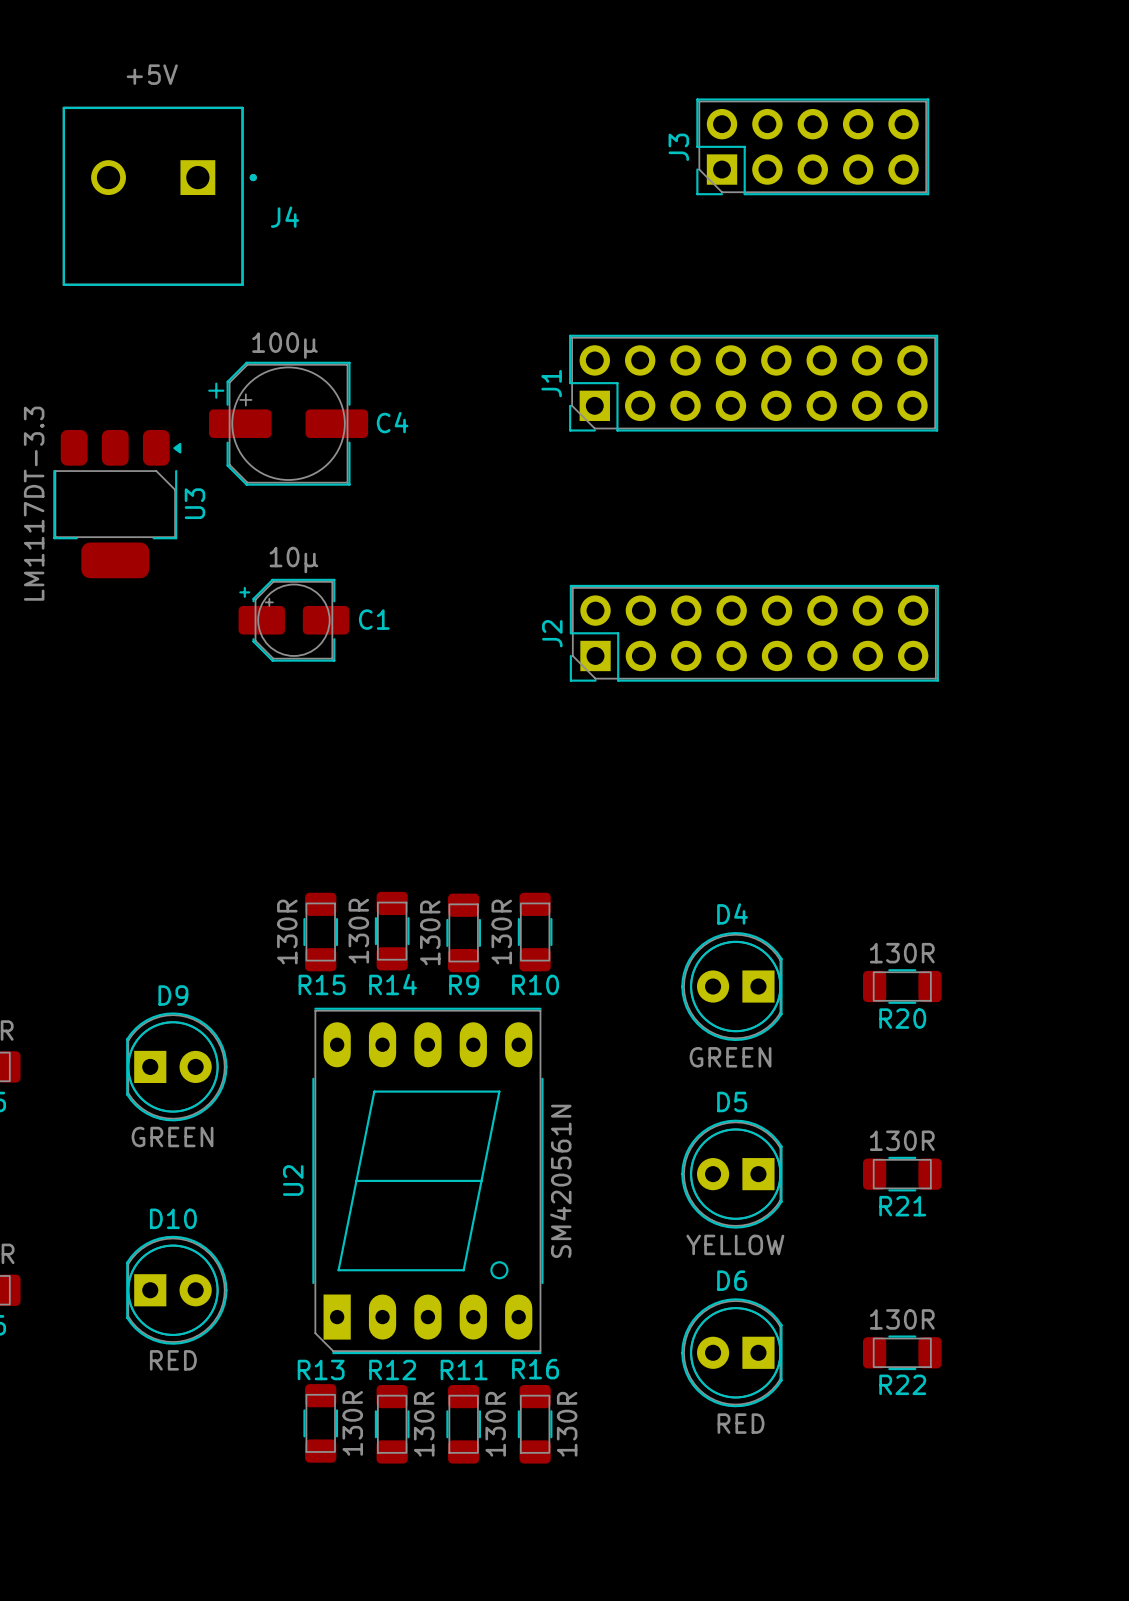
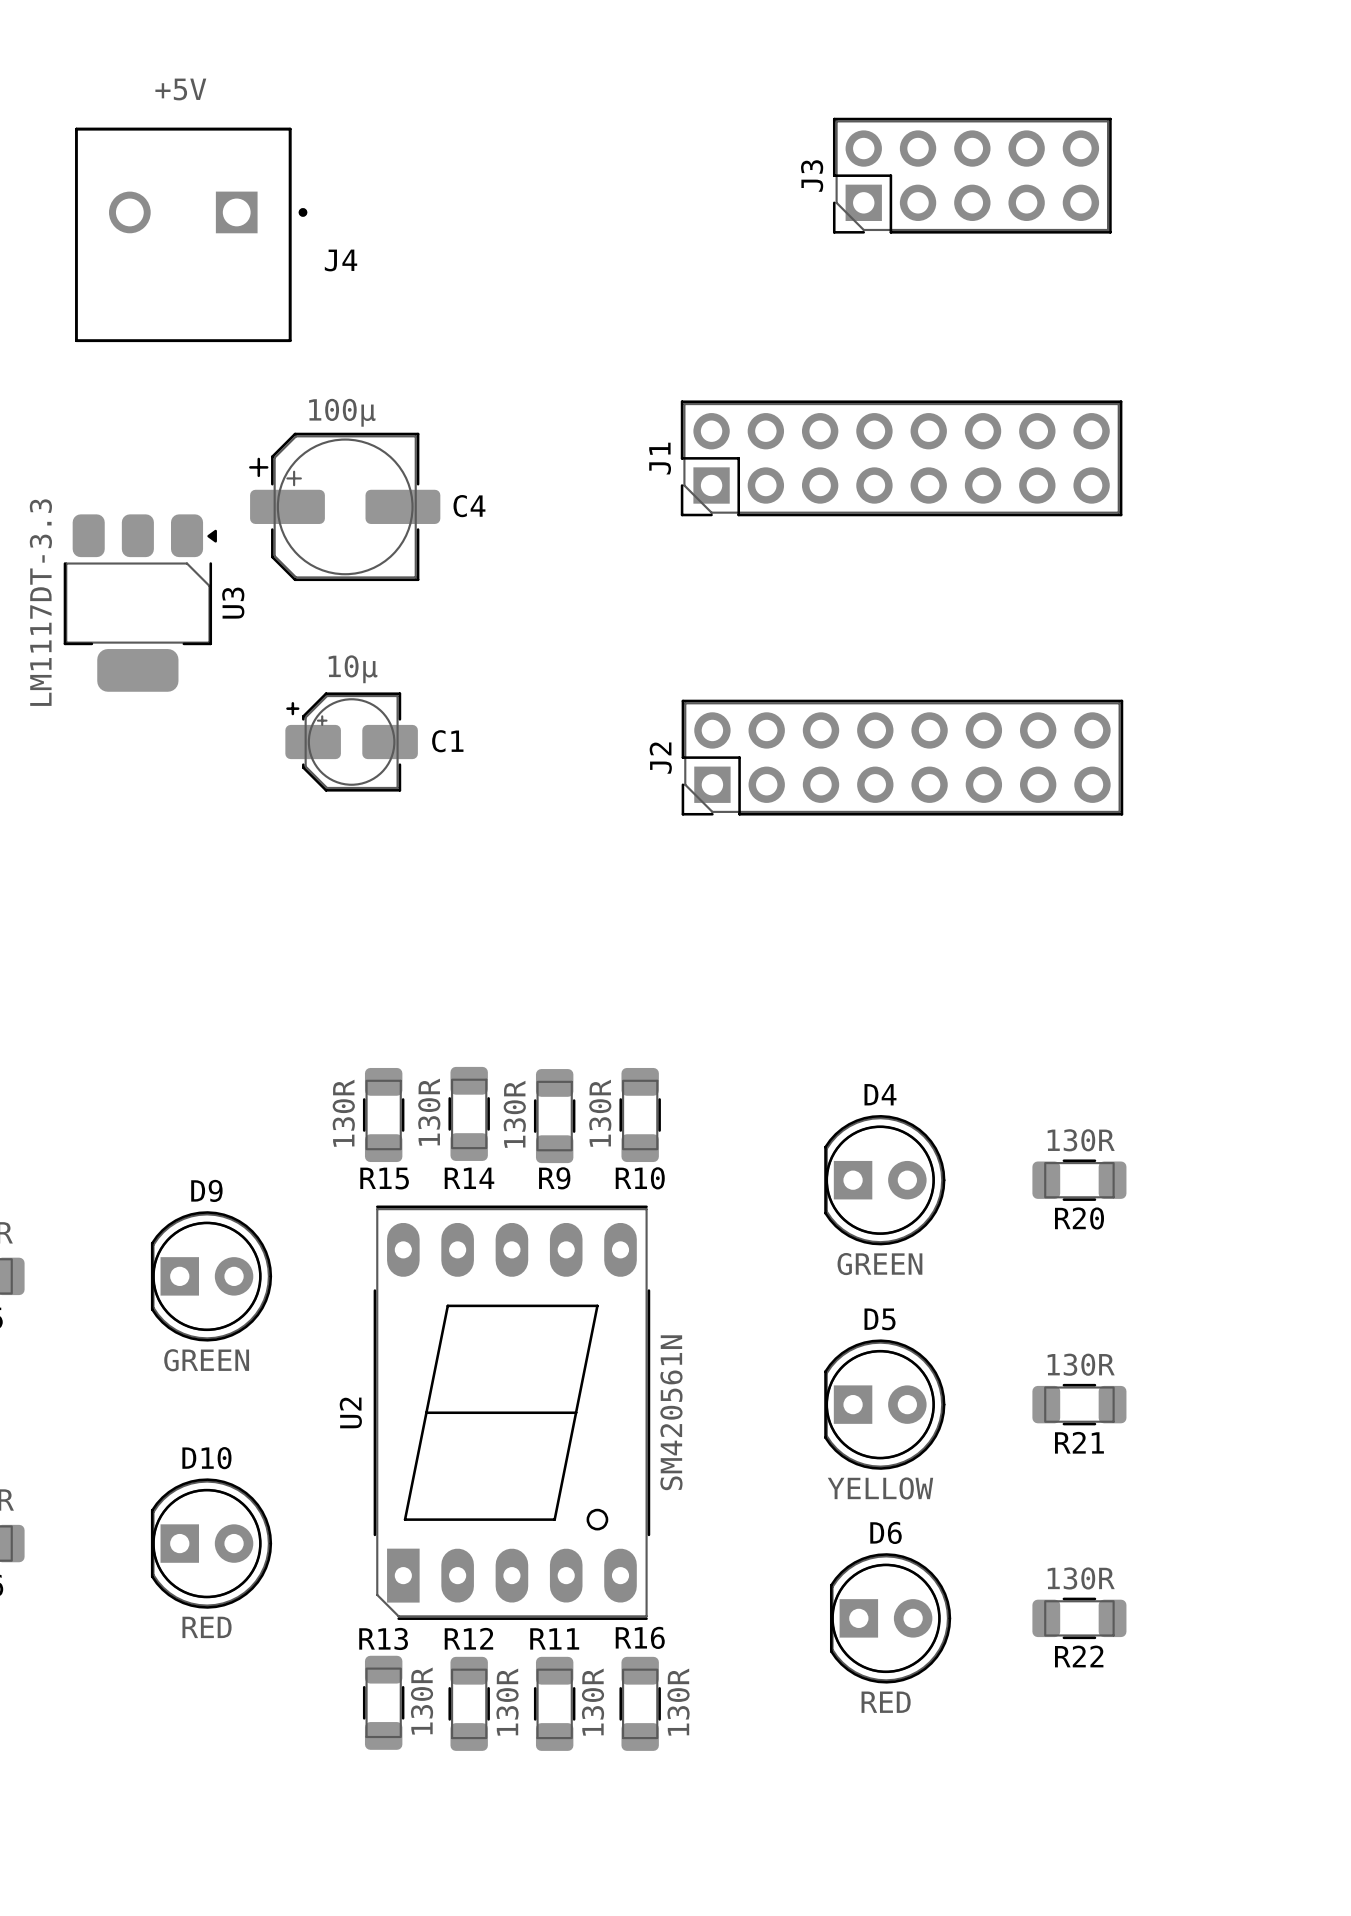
D4 rotation: 0° (731, 986) -> 180° (884, 1180)
D5 rotation: 0° (731, 1174) -> 180° (884, 1404)
D6 rotation: 0° (731, 1352) -> 180° (890, 1618)

